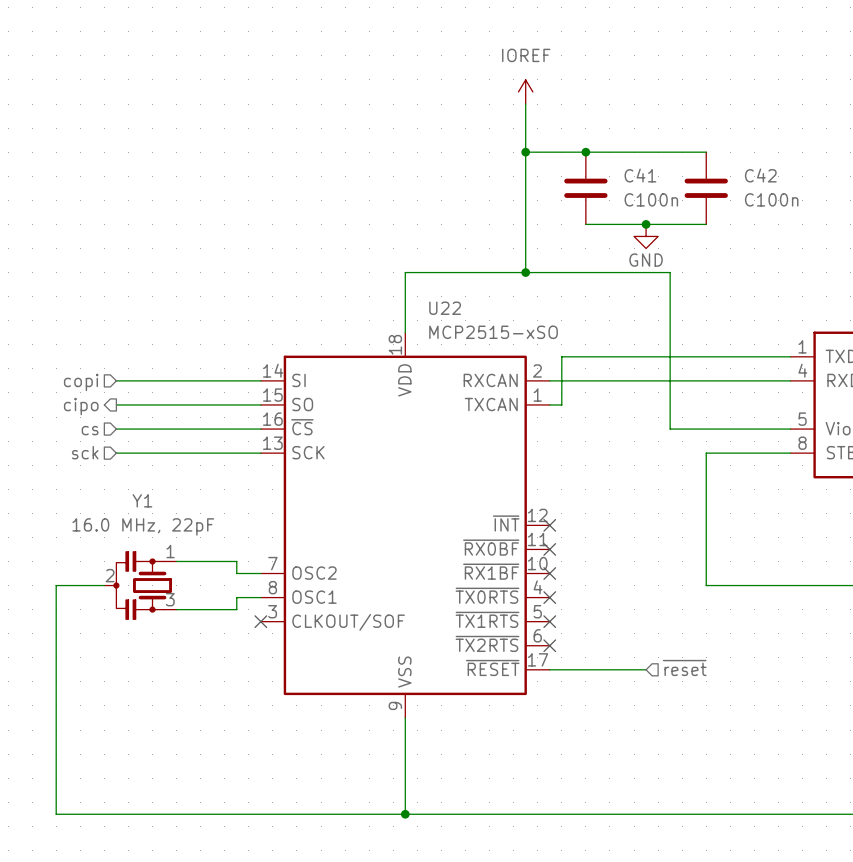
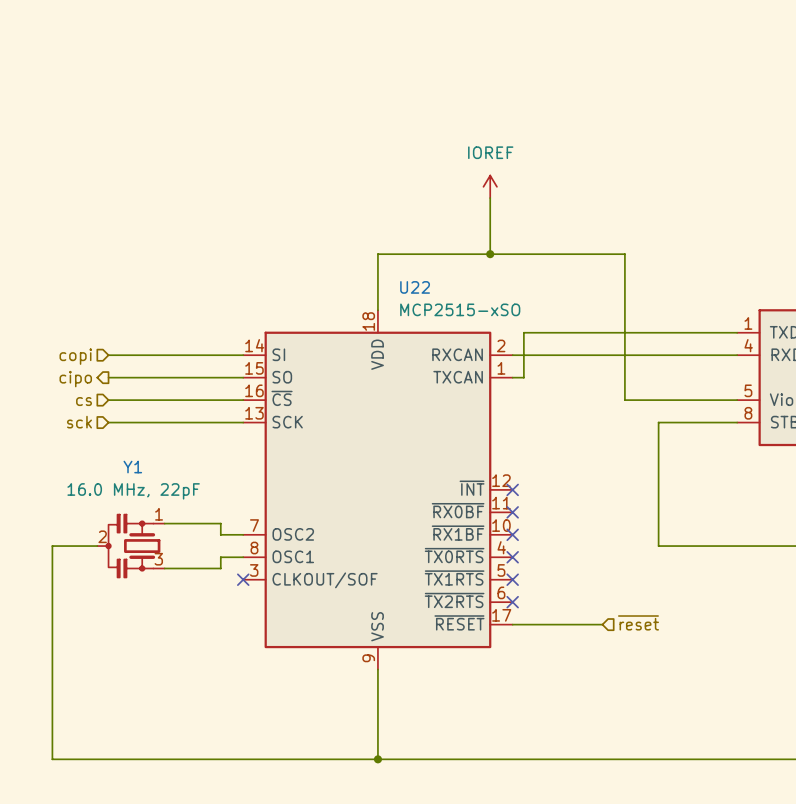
power symbol position: IOREF (525, 91) -> IOREF (490, 186)
wire: (525, 104) (525, 212) -> none
wire: (525, 152) (706, 152) -> none
junction: (525, 152) -> none
junction: (585, 152) -> none
C41: C100n (585, 188) -> none
C42: C100n (706, 188) -> none
wire: (585, 224) (706, 224) -> none
junction: (646, 224) -> none
power symbol: GND (646, 236) -> none

